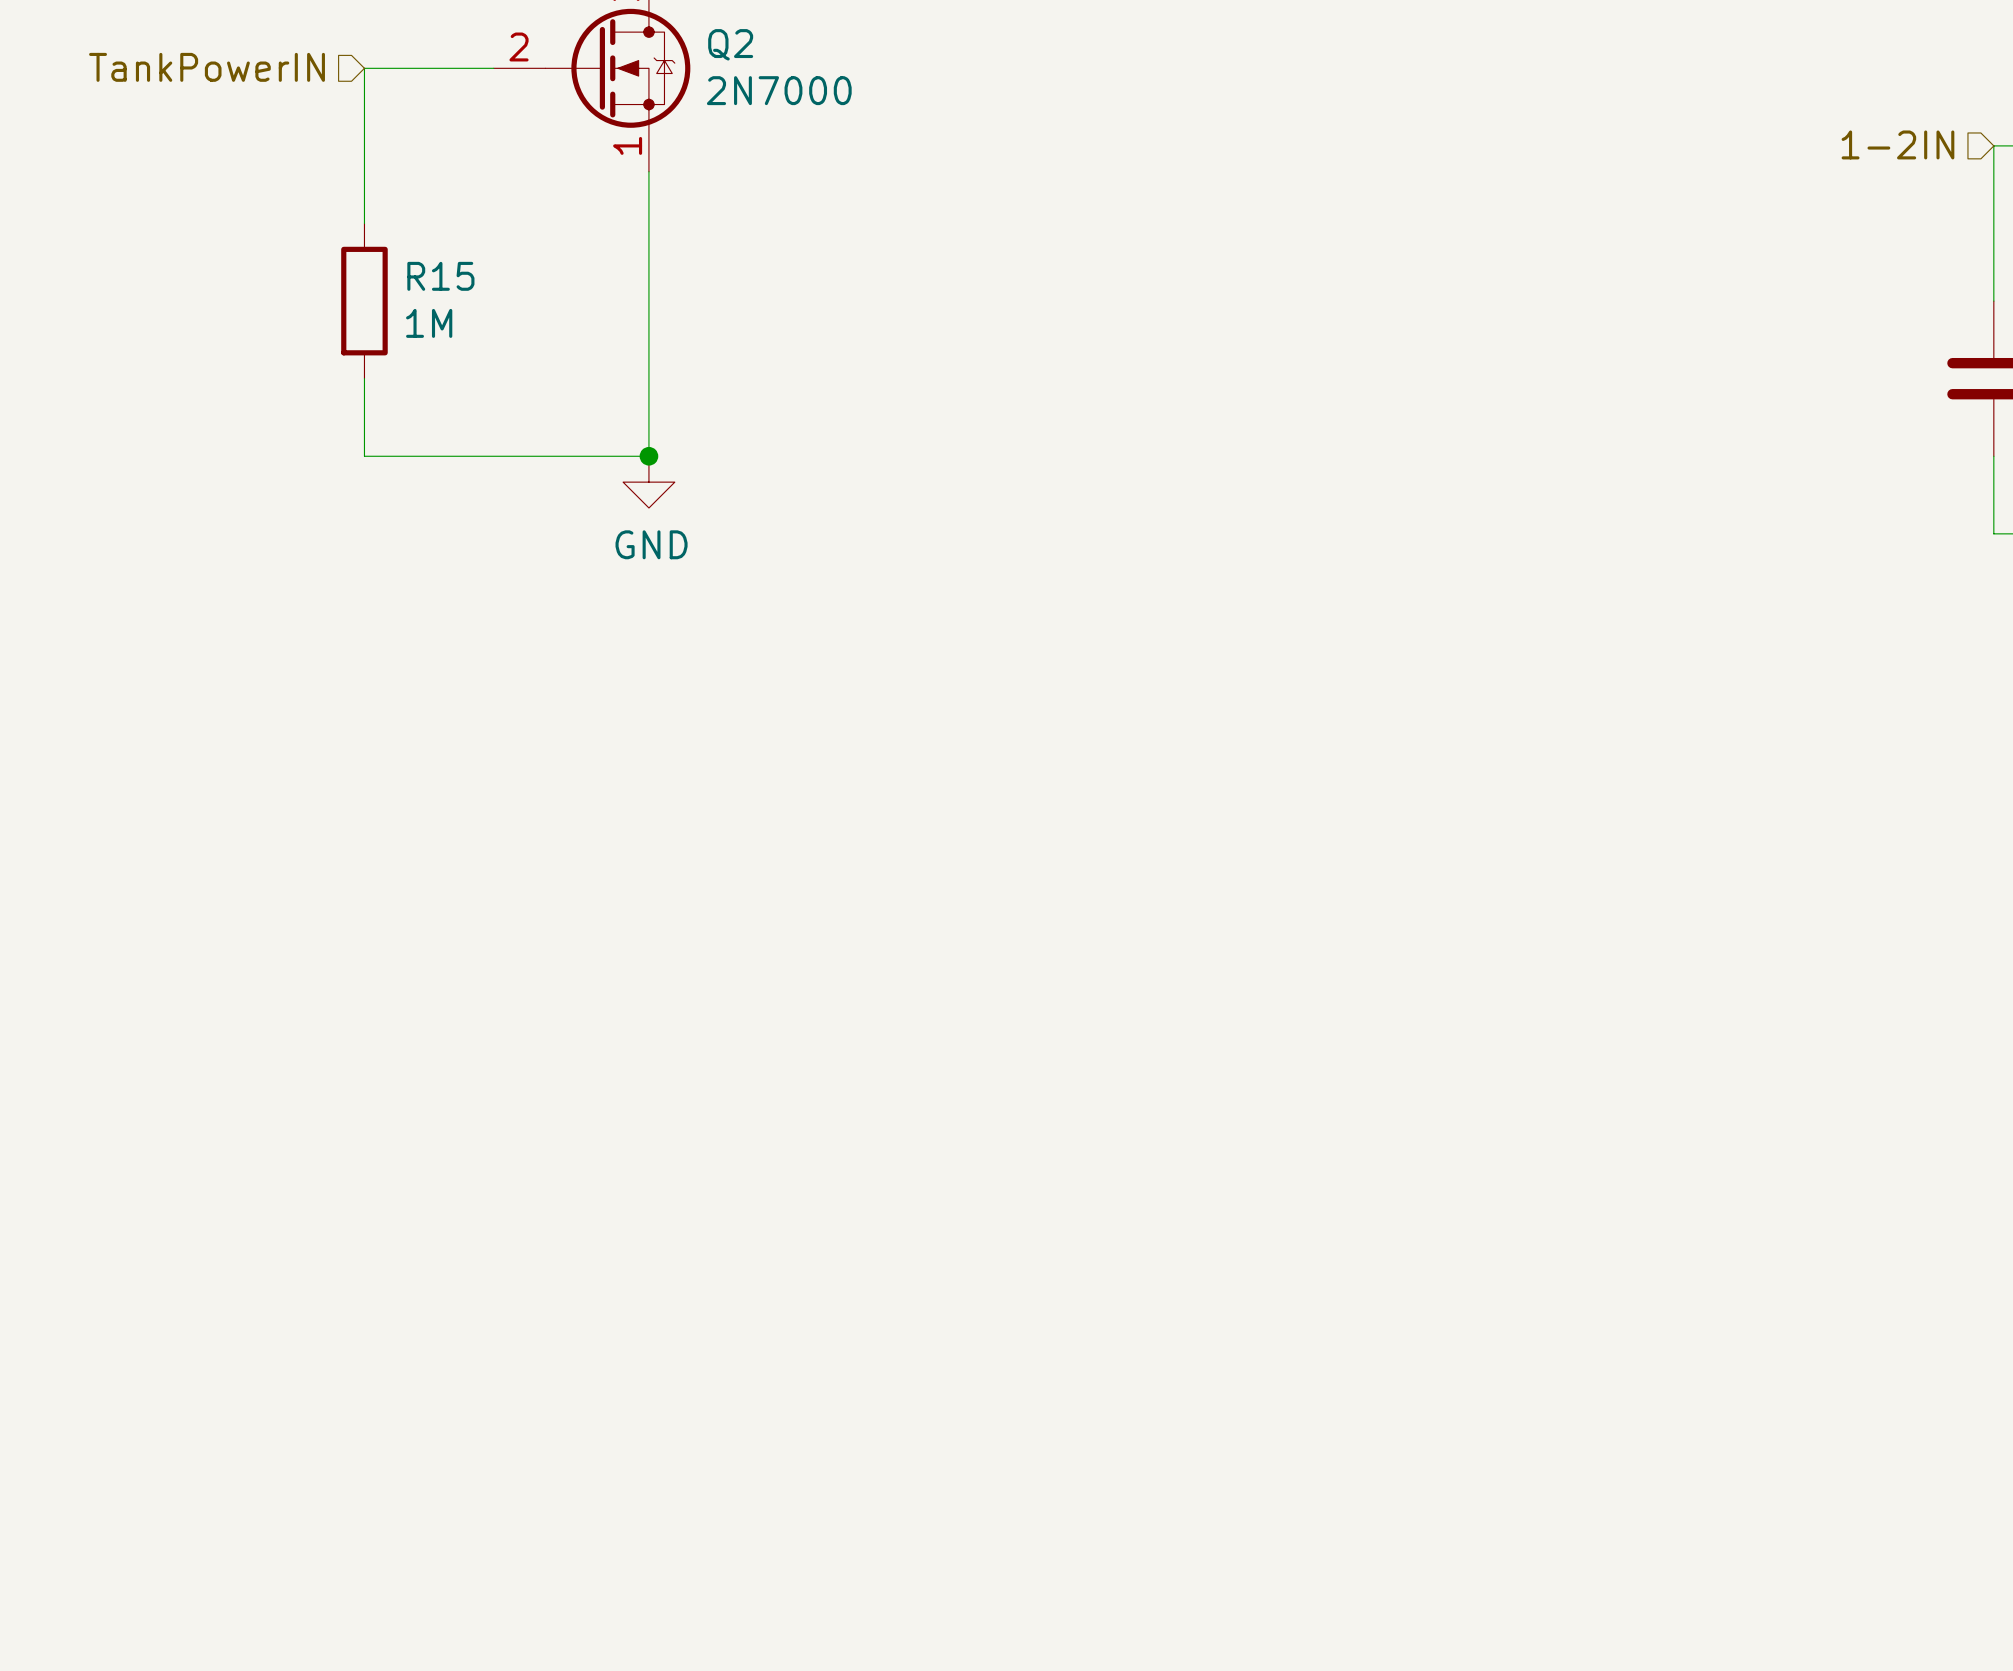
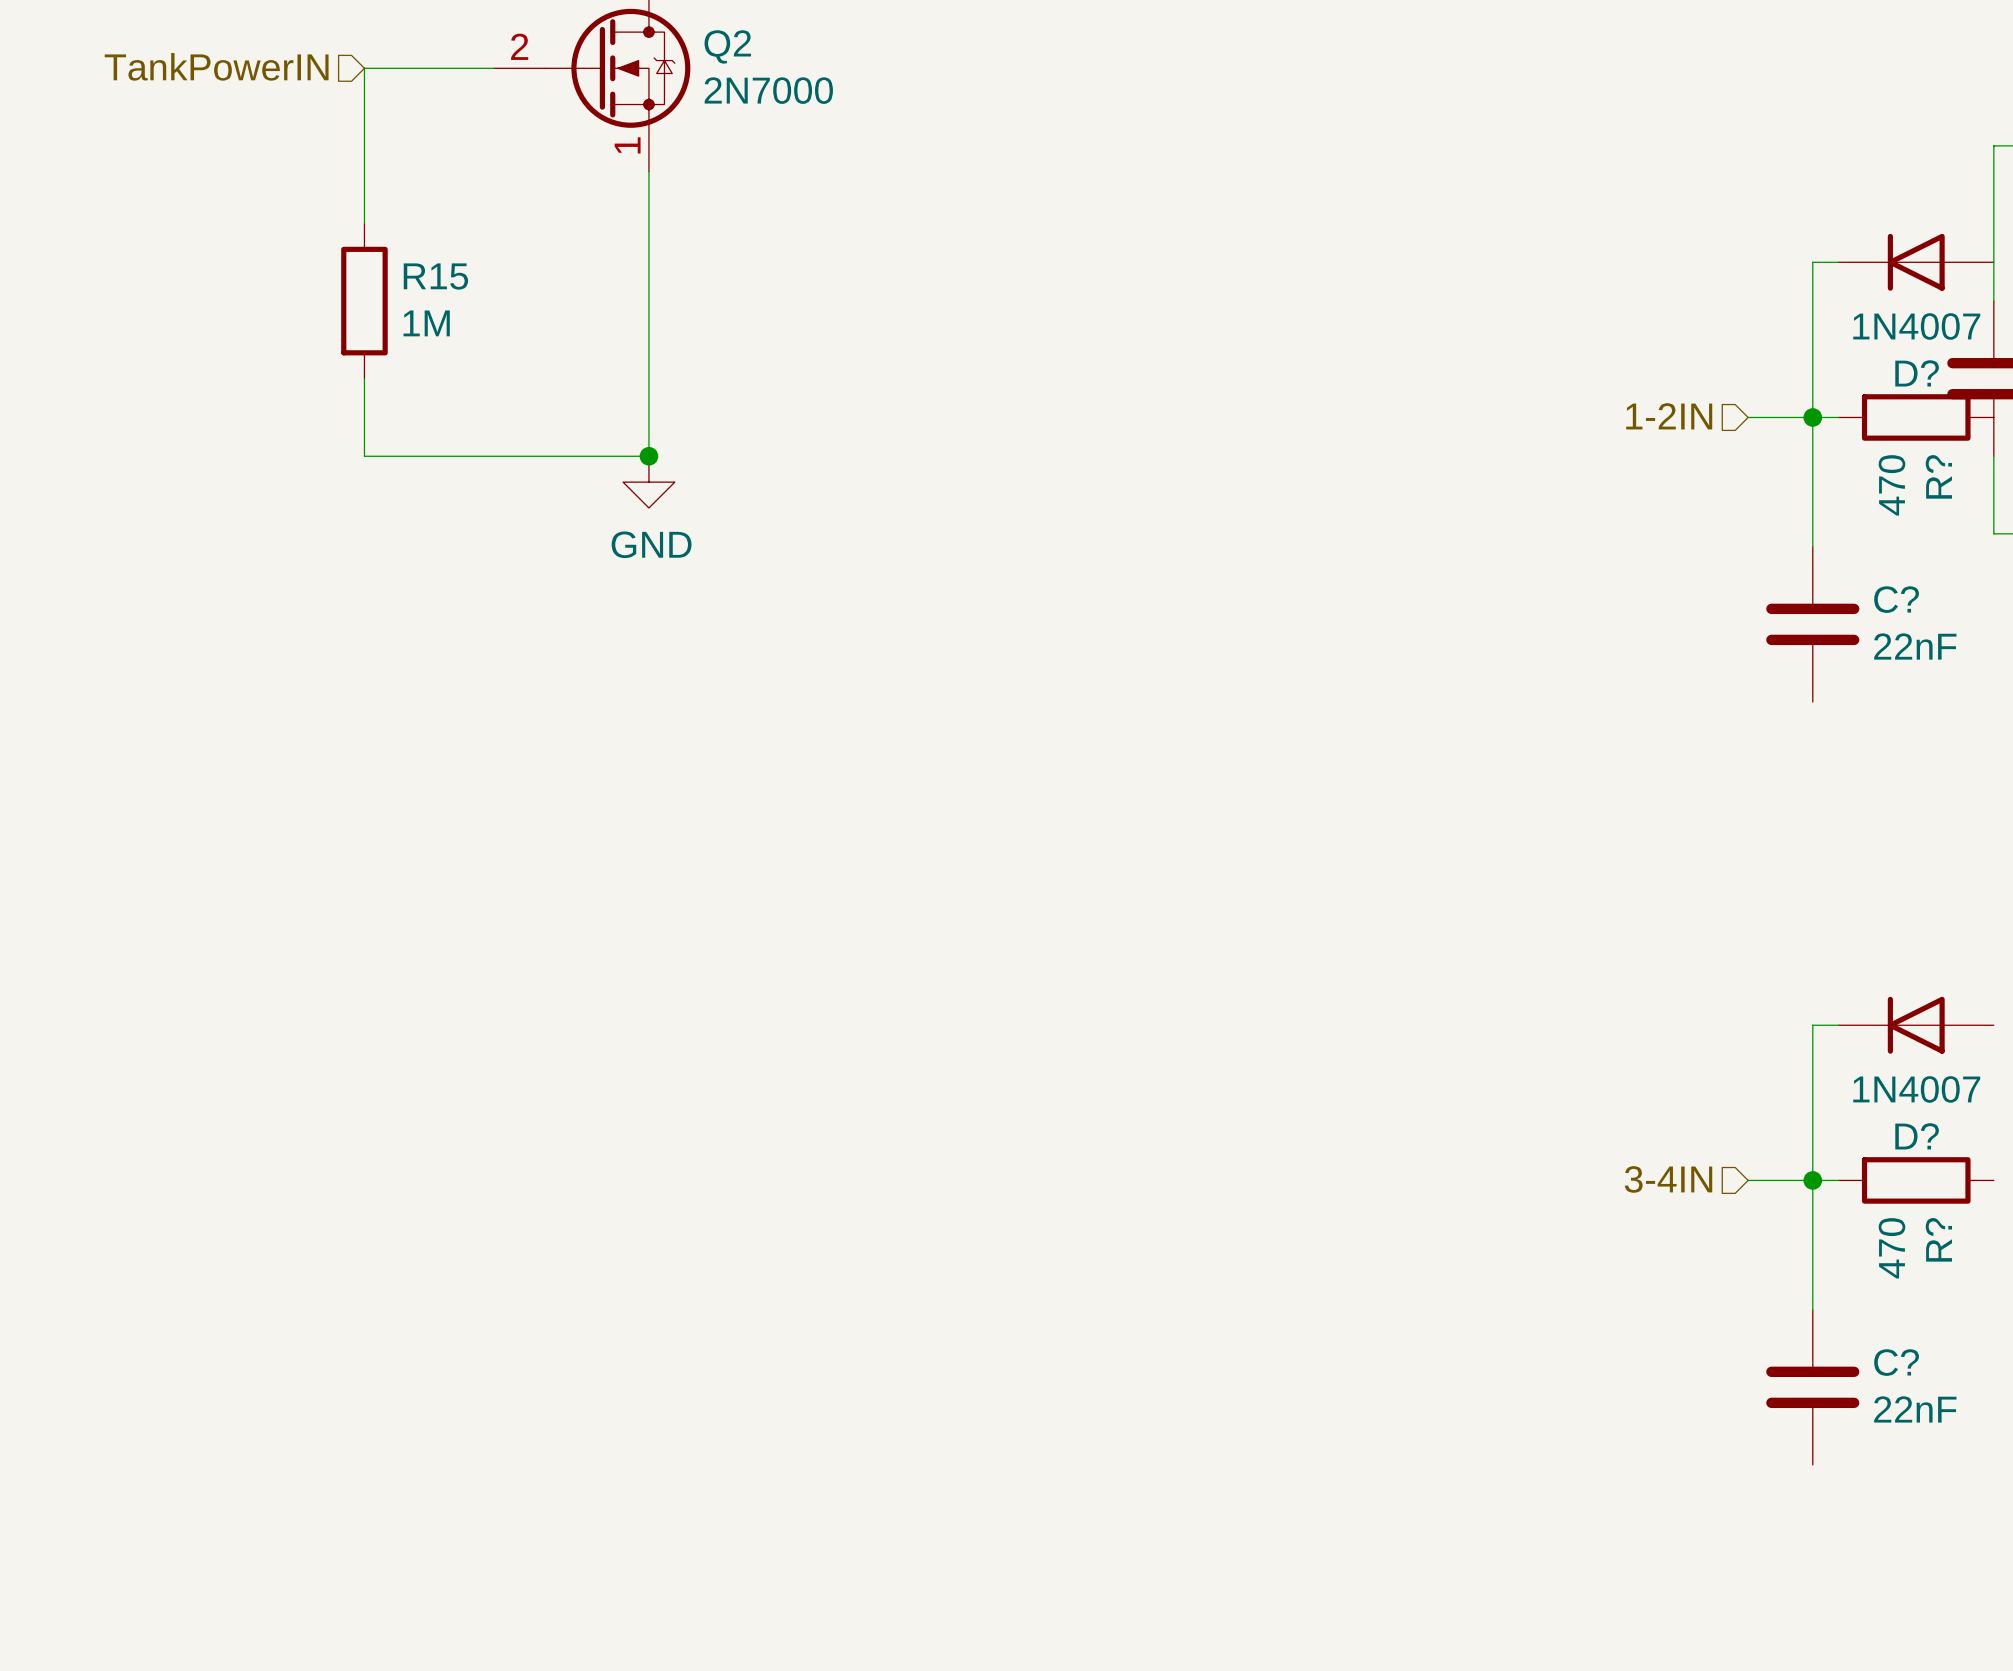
hierarchical label position: 1-2IN (1897, 144) -> 1-2IN (1669, 416)
wire: none -> (1838, 262) (1812, 262) (1812, 546)
D?: none -> 1N4007 (1916, 262)
wire: none -> (1748, 417) (1838, 417)
junction: none -> (1812, 417)
R?: none -> 470 (1916, 417)
C?: none -> 22nF (1812, 624)
wire: none -> (1838, 1025) (1812, 1025) (1812, 1309)
D?: none -> 1N4007 (1916, 1025)
hierarchical label: none -> 3-4IN (1668, 1179)
wire: none -> (1748, 1180) (1838, 1180)
junction: none -> (1812, 1180)
R?: none -> 470 (1916, 1180)
C?: none -> 22nF (1812, 1387)

